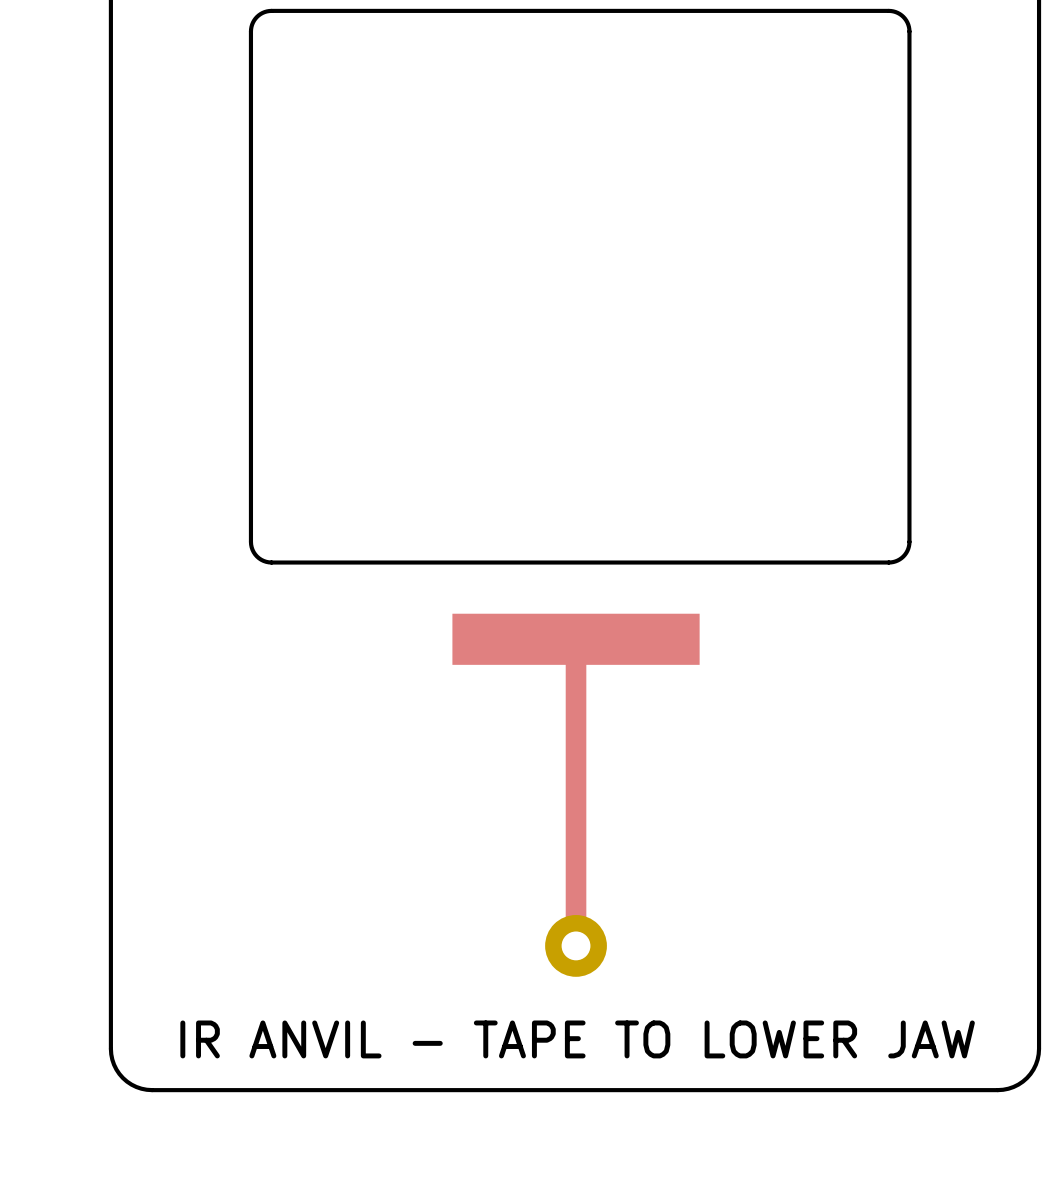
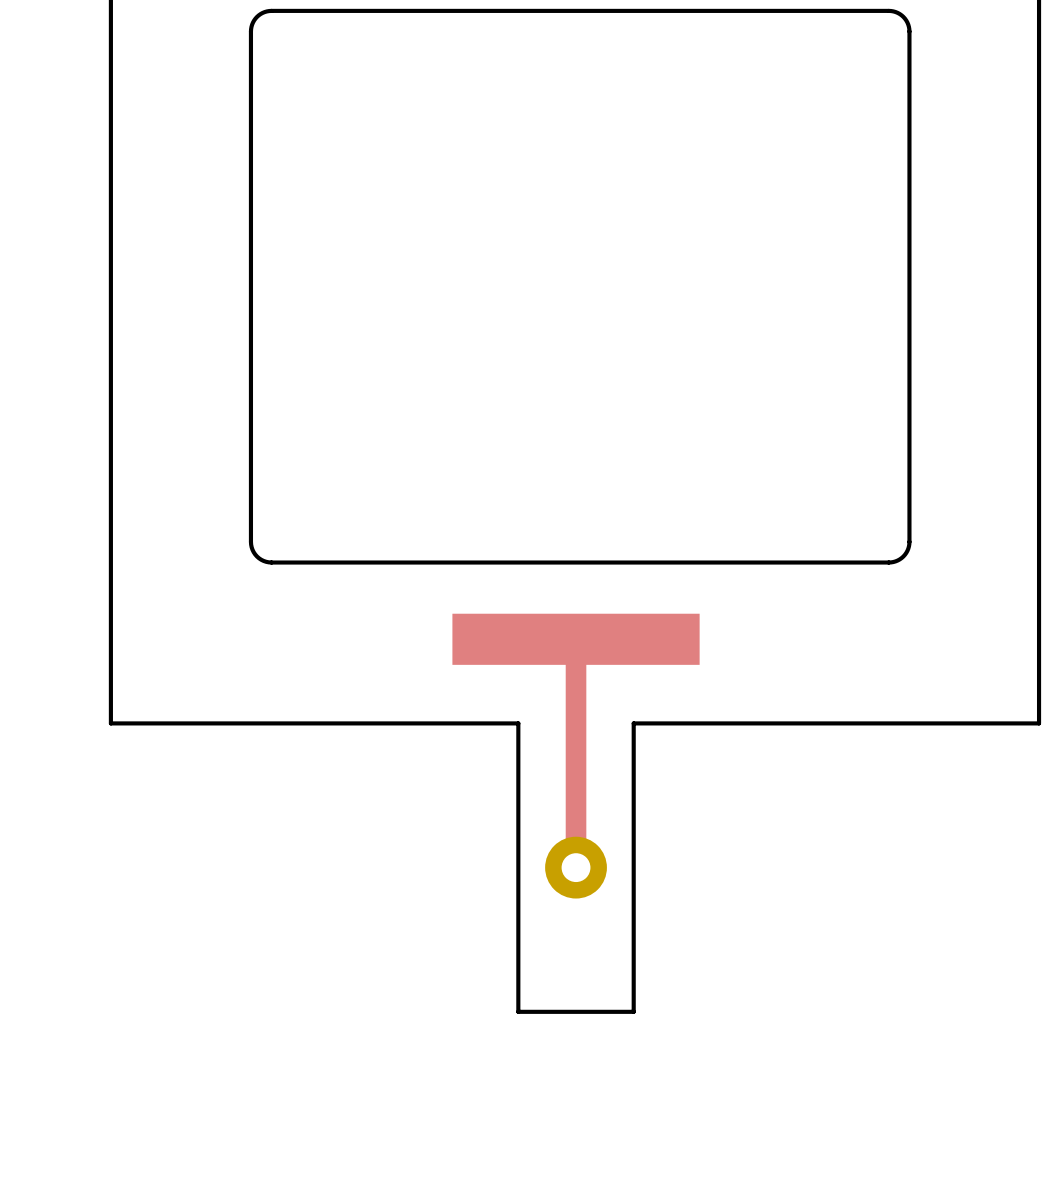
board edge: (1039, 723) (1038, 1054) (1033, 1069) (1022, 1081) (1008, 1088) (997, 1090) (152, 1090) (136, 1086) (119, 1074) (111, 1054) (110, 723) -> (1039, 723) (633, 723) (633, 1011) (518, 1011) (518, 723) (110, 723)
top track: (576, 867) (576, 945) -> none
part position: (576, 945) -> (576, 867)
text: IR ANVIL - TAPE TO LOWER JAW (577, 1039) -> none

